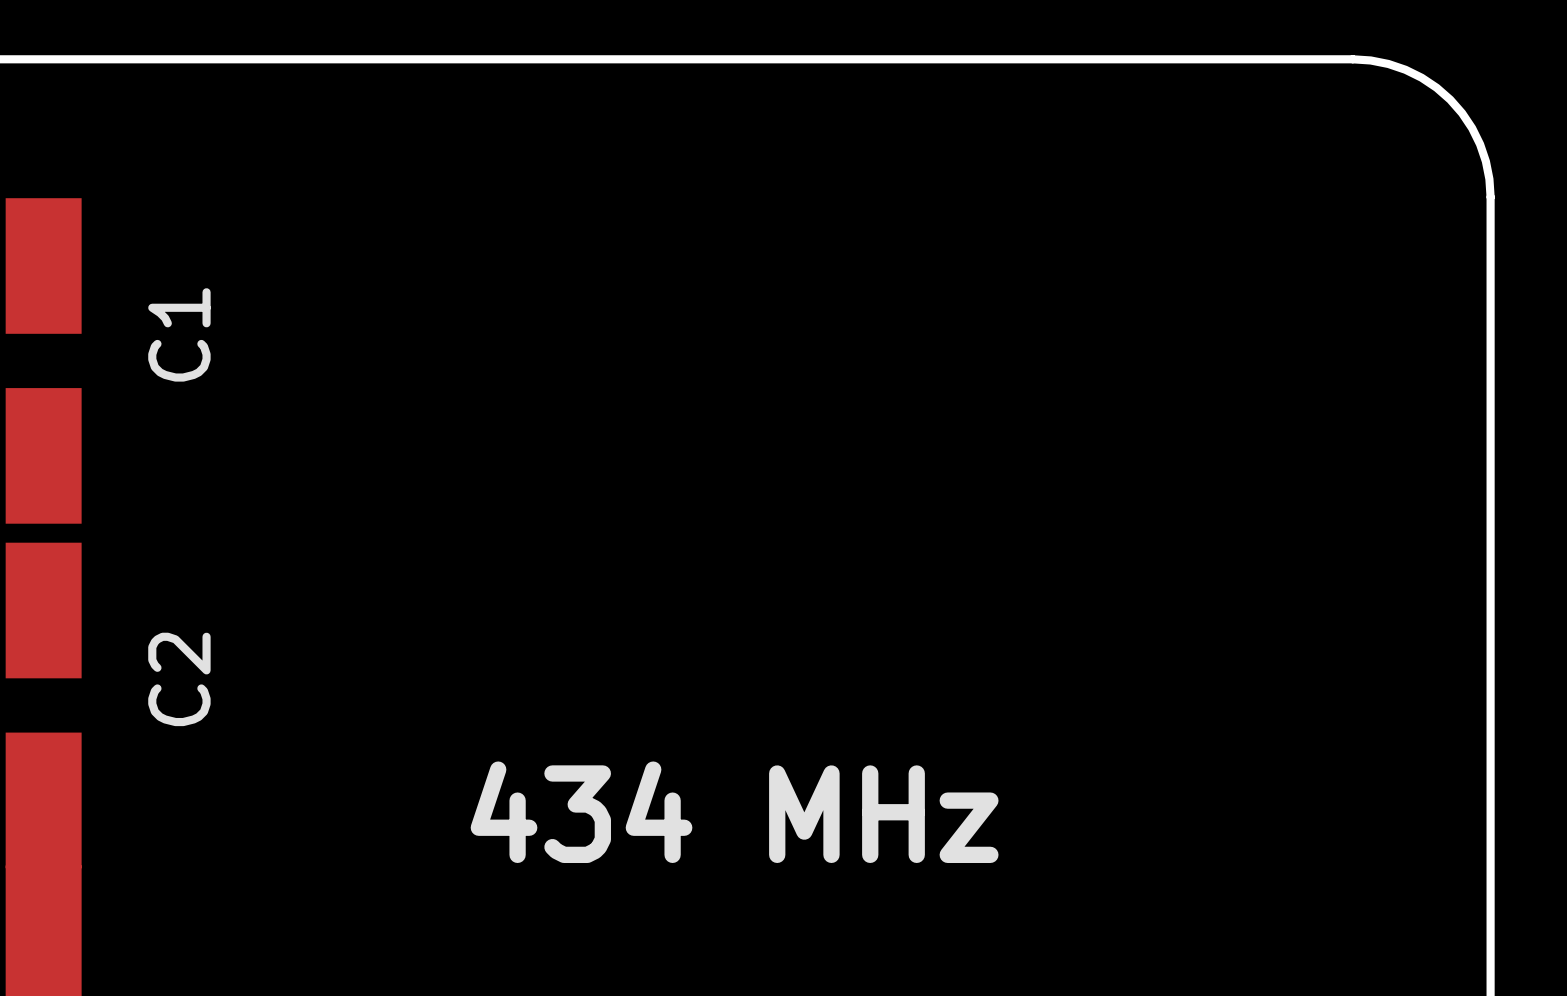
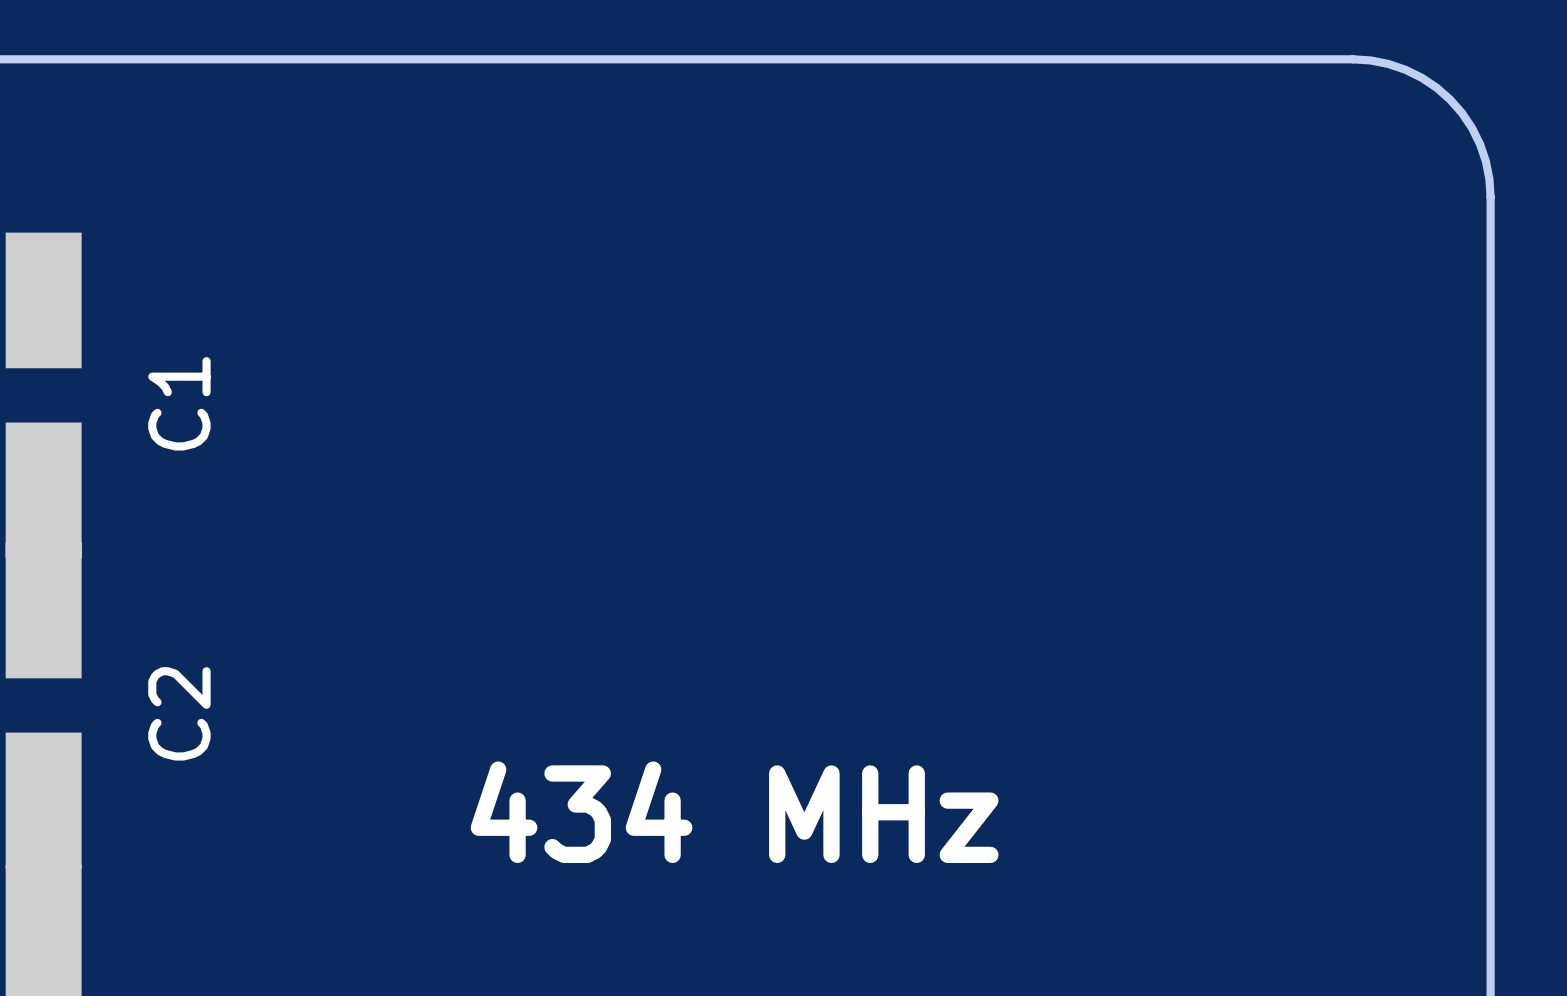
C1 name position: C1 (179, 334) -> C1 (179, 403)
C1 position: (43, 360) -> (43, 395)
C2 name position: C2 (179, 679) -> C2 (179, 713)

